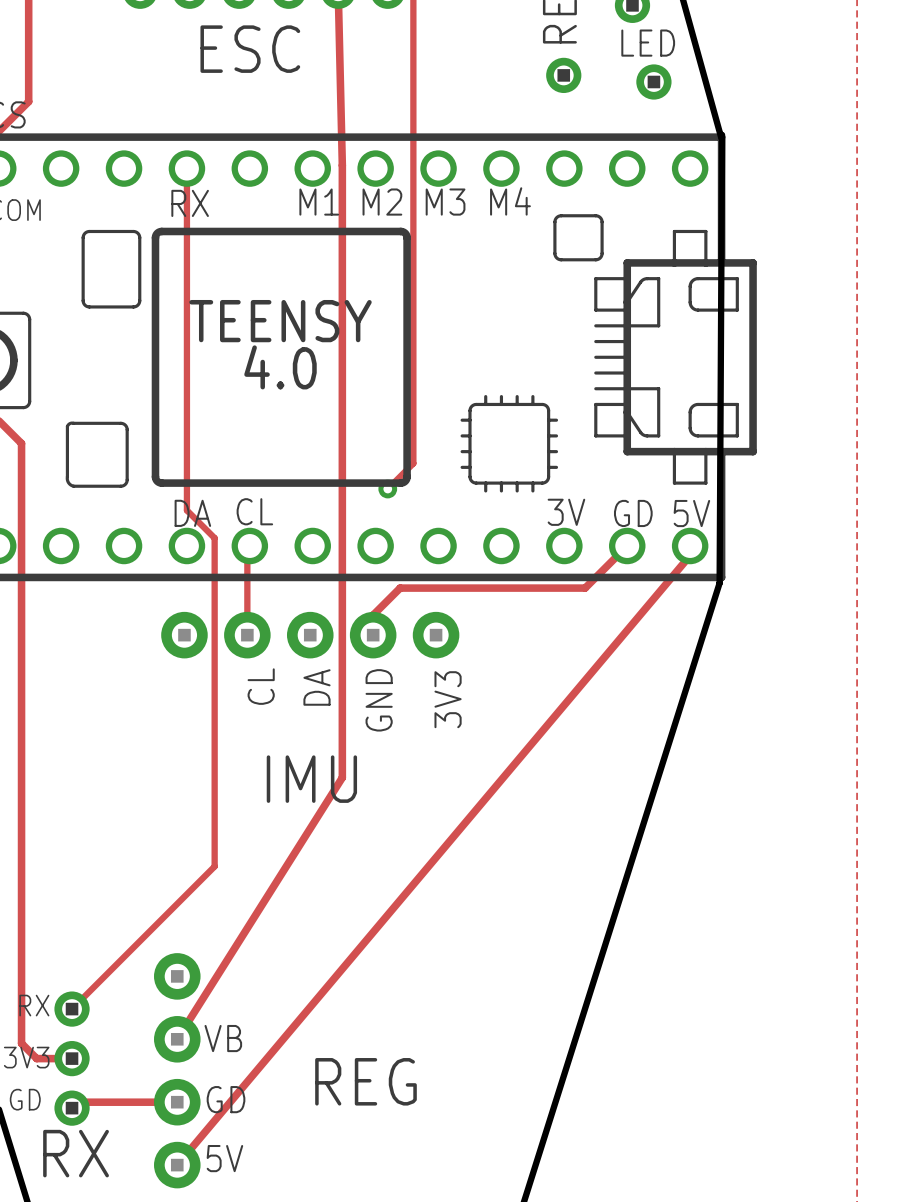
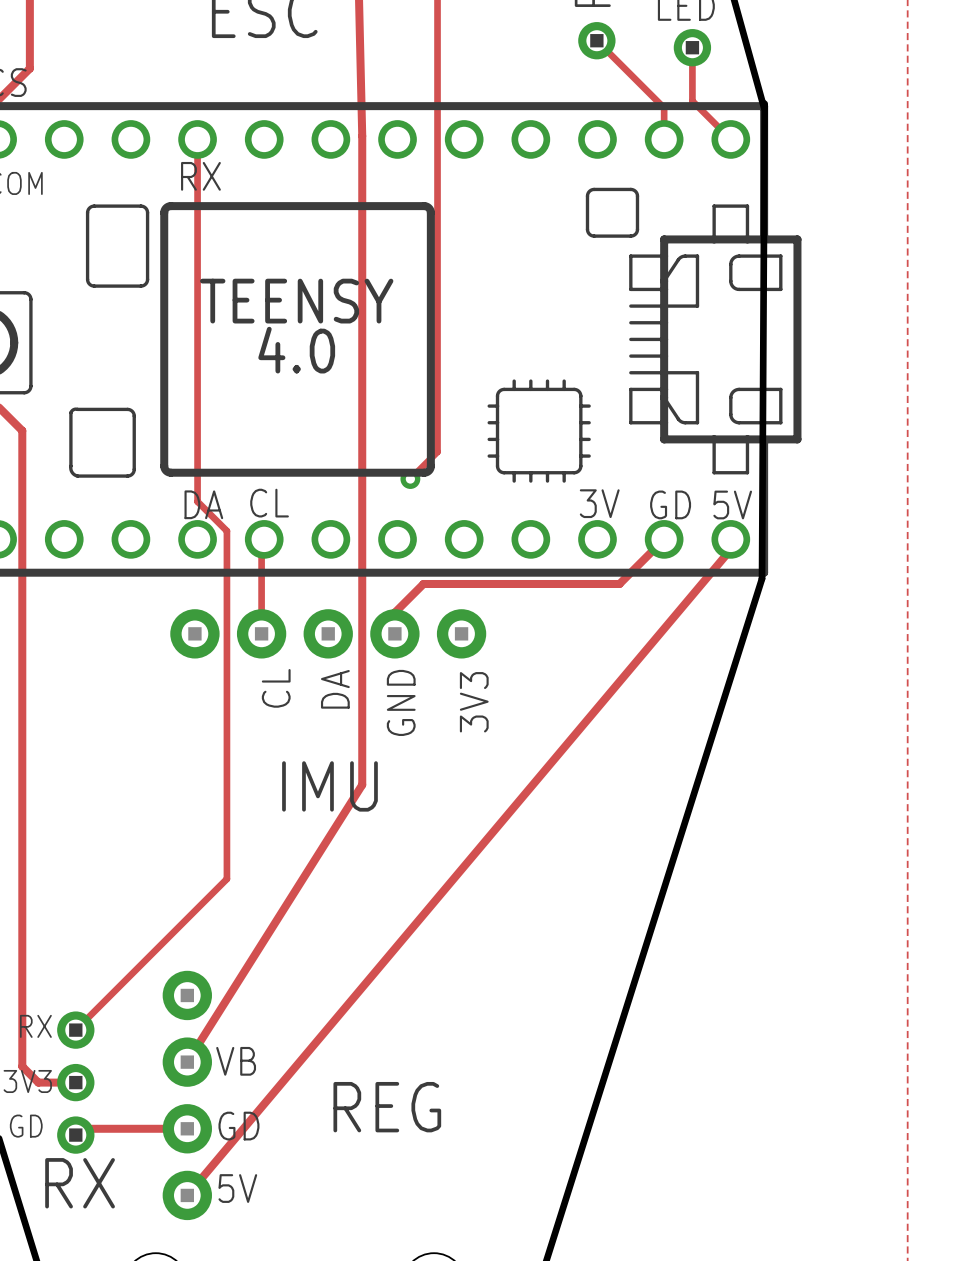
track: none -> (596, 40) (664, 107) (664, 139)
track: none -> (692, 47) (692, 101) (730, 139)
text: M4 (510, 201) -> none
text: M1 (319, 202) -> none
text: M2 (382, 202) -> none
text: M3 (445, 202) -> none

